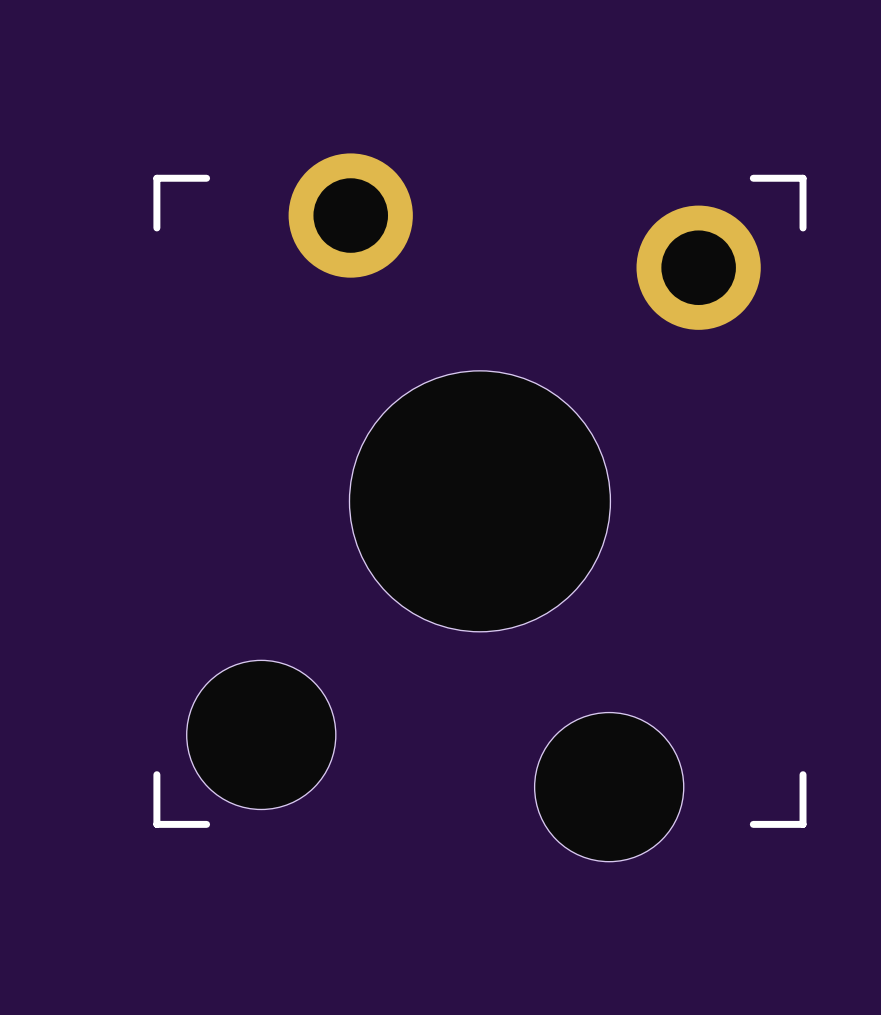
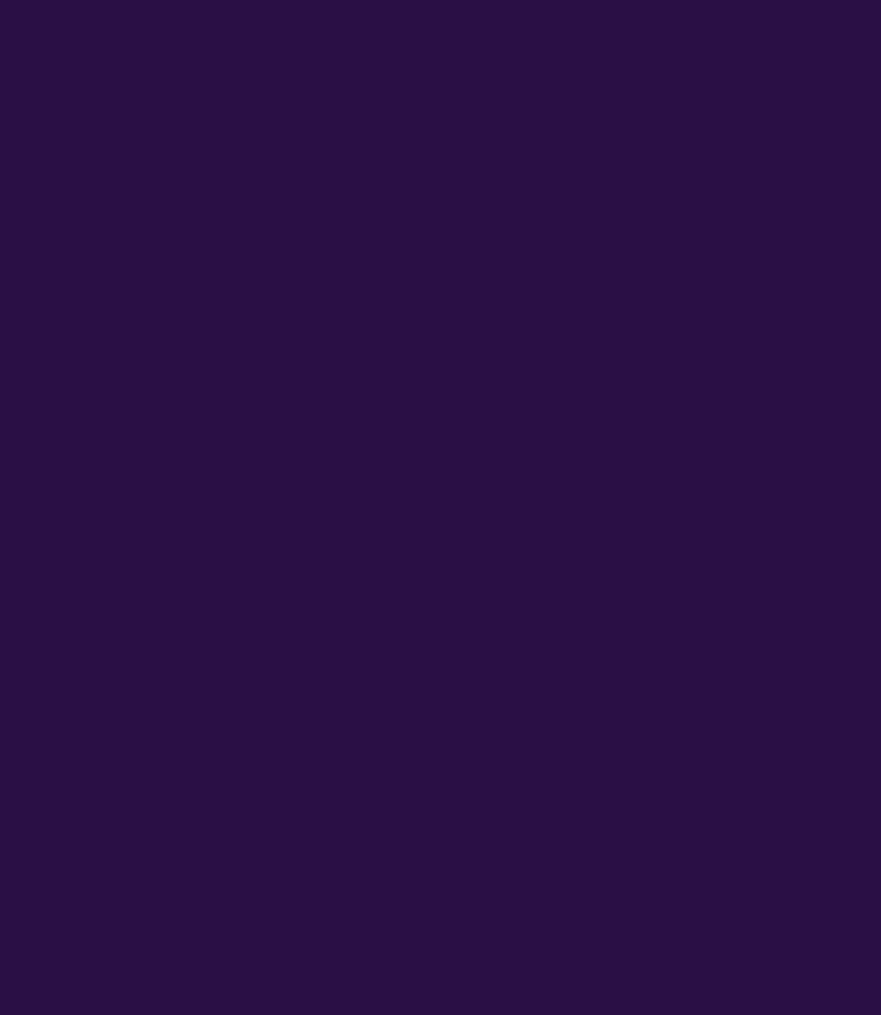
part: (479, 507) -> none

